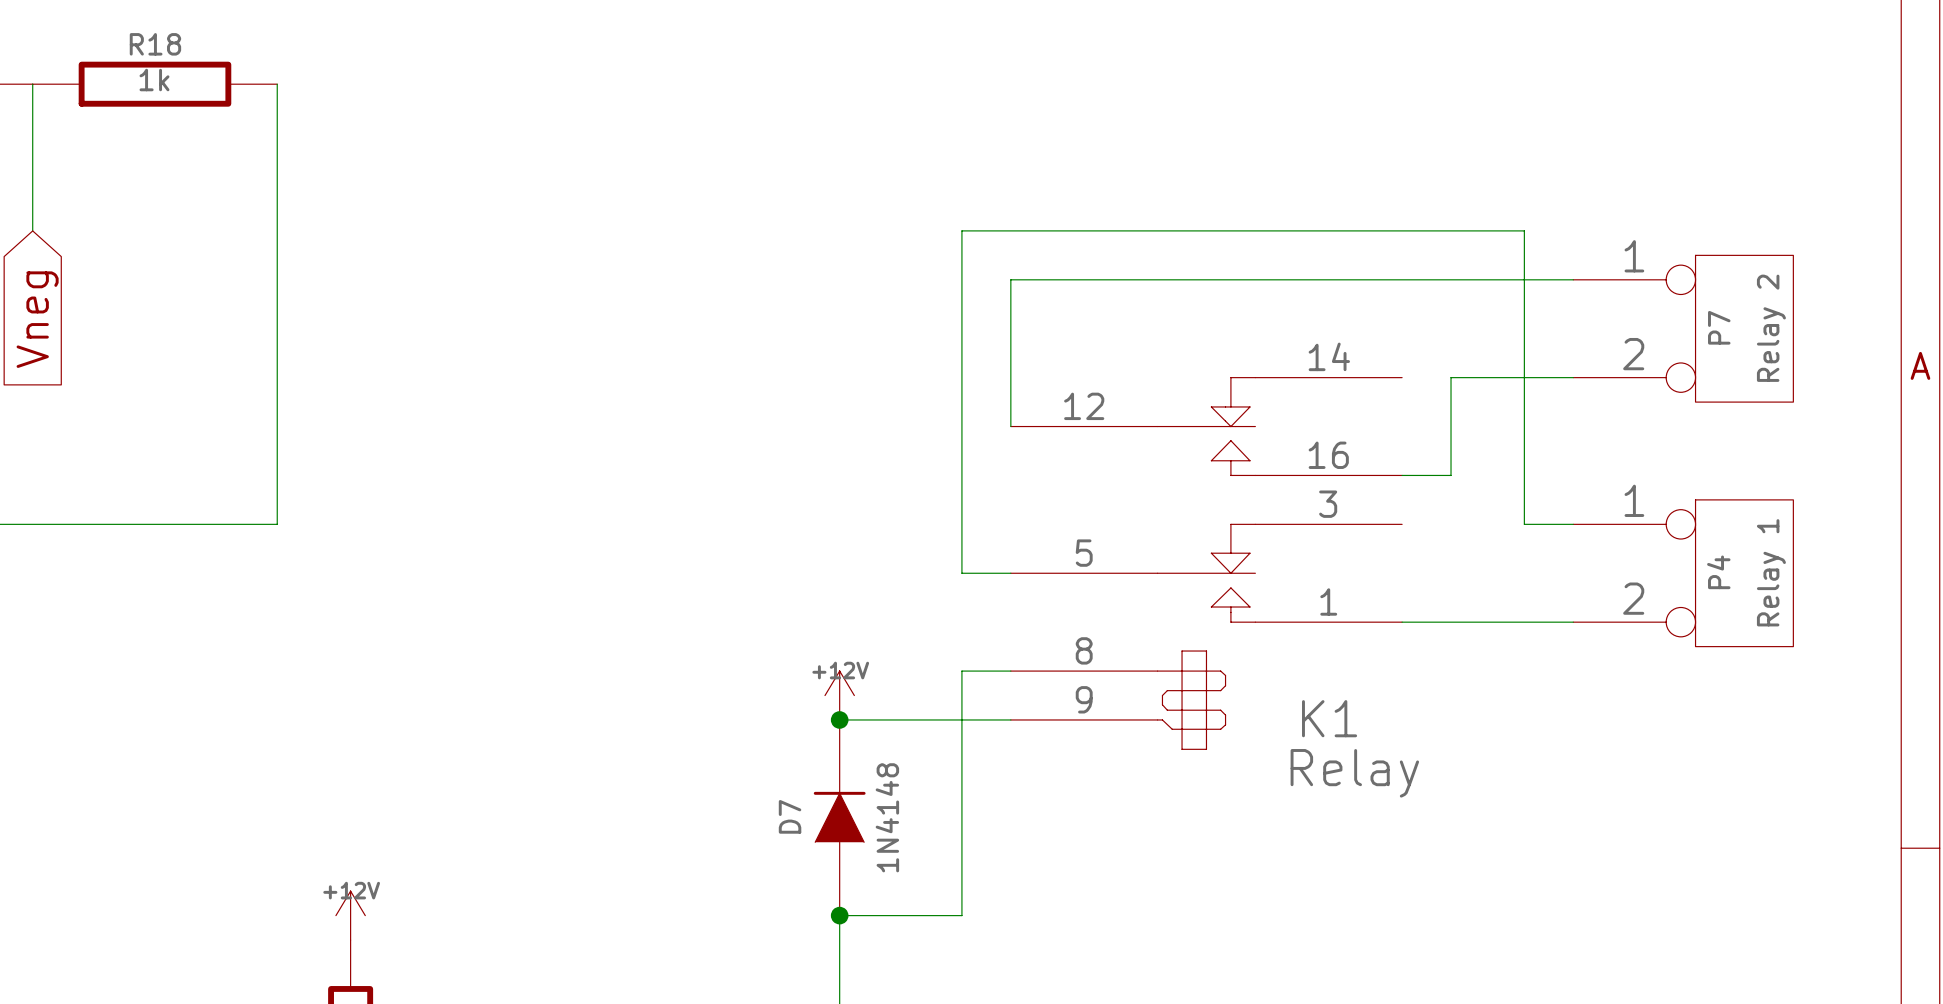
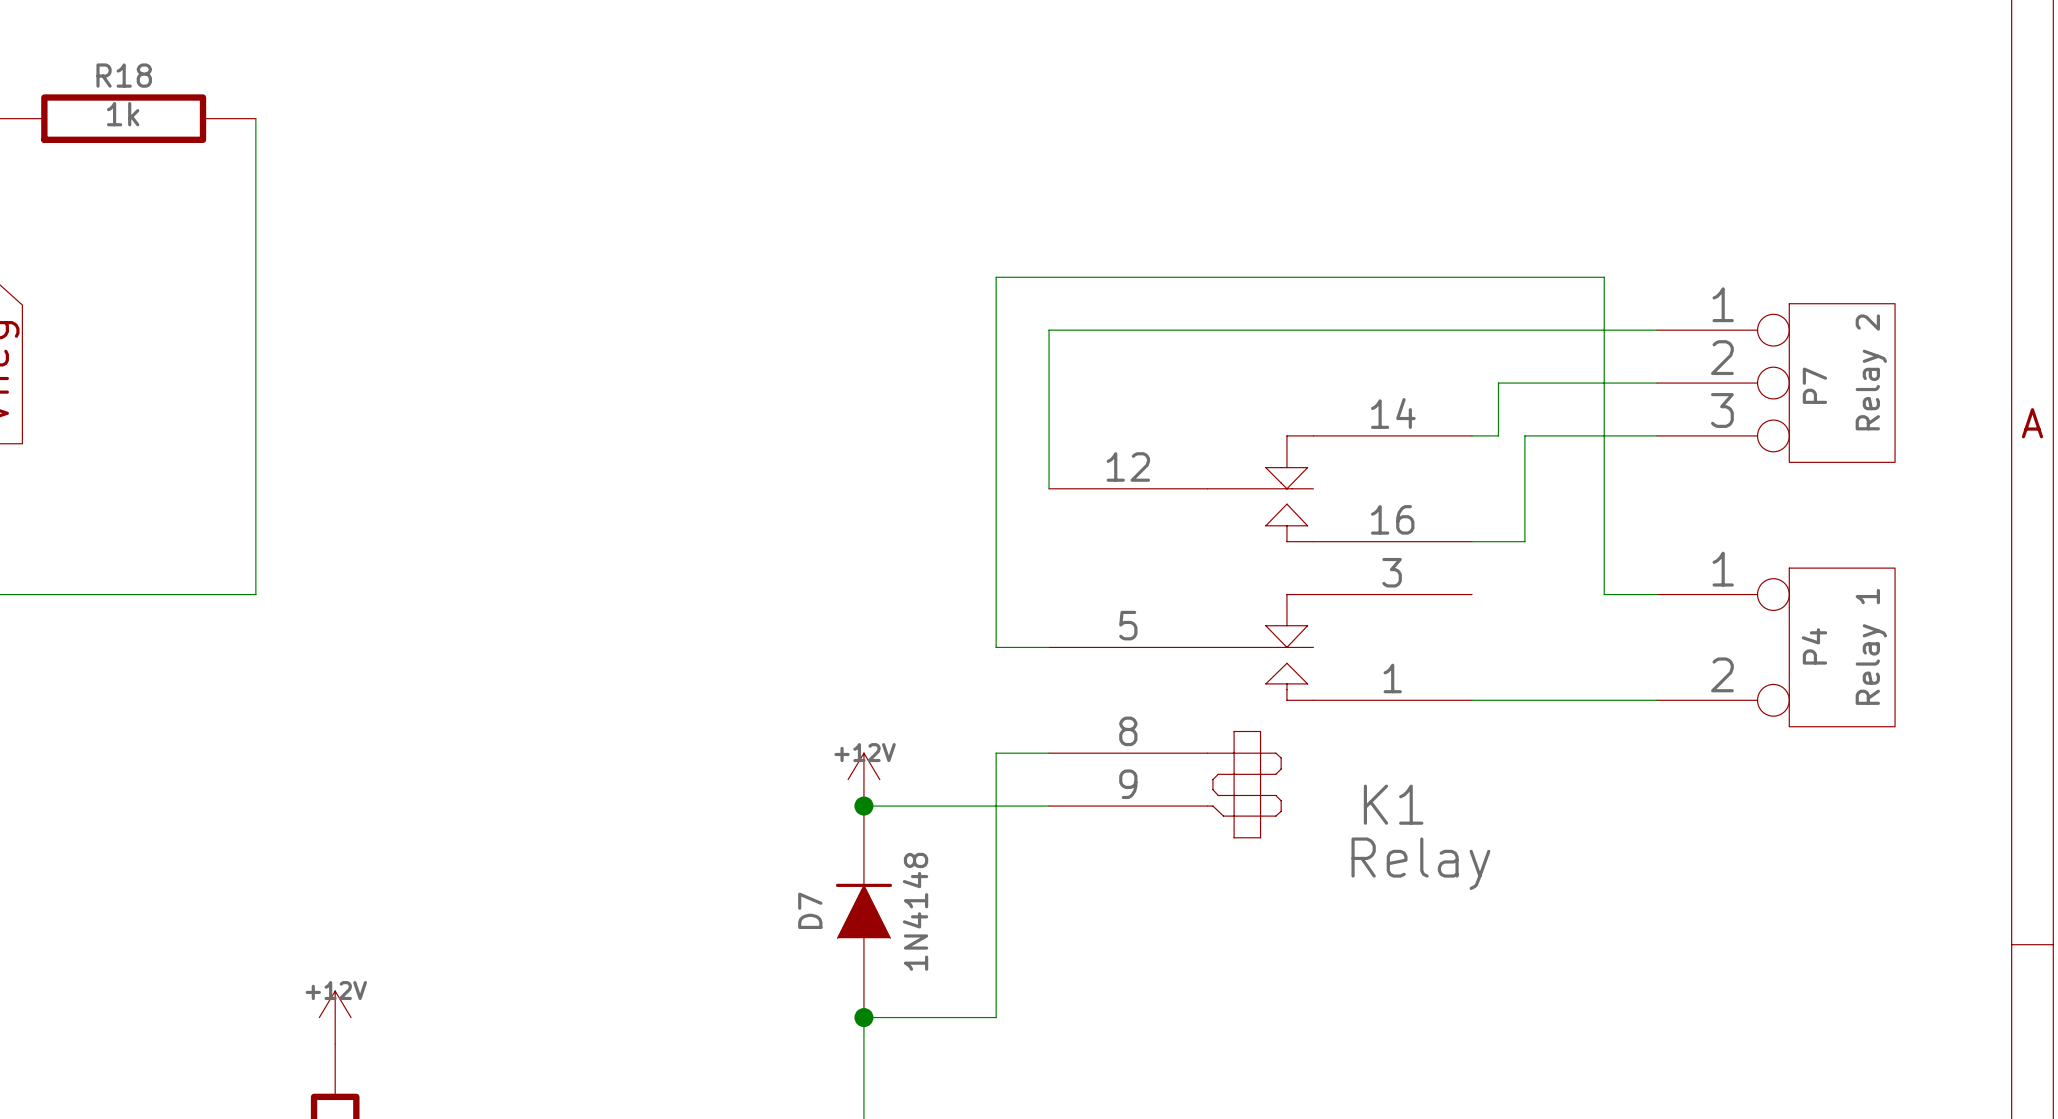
P7 symbol: [1573, 255, 1794, 403] -> [1657, 303, 1896, 463]
wire: none -> (1657, 383) (1498, 383) (1498, 435) (1472, 435)

